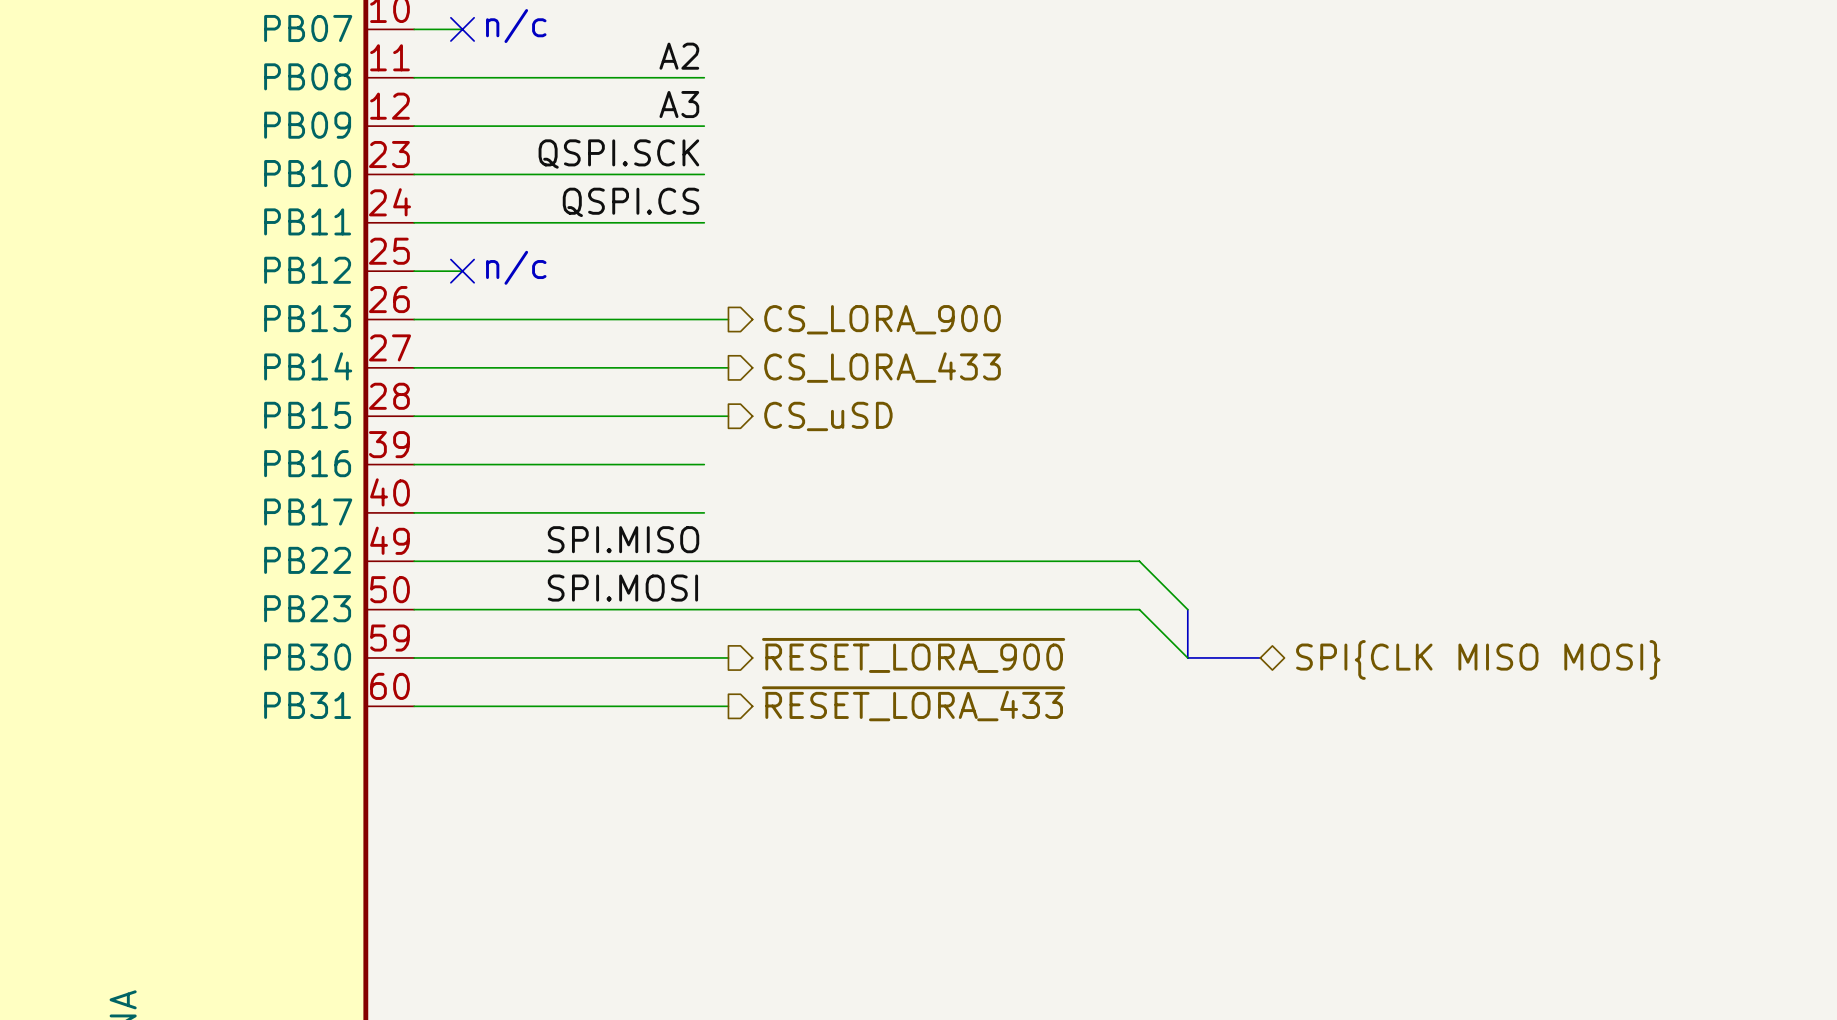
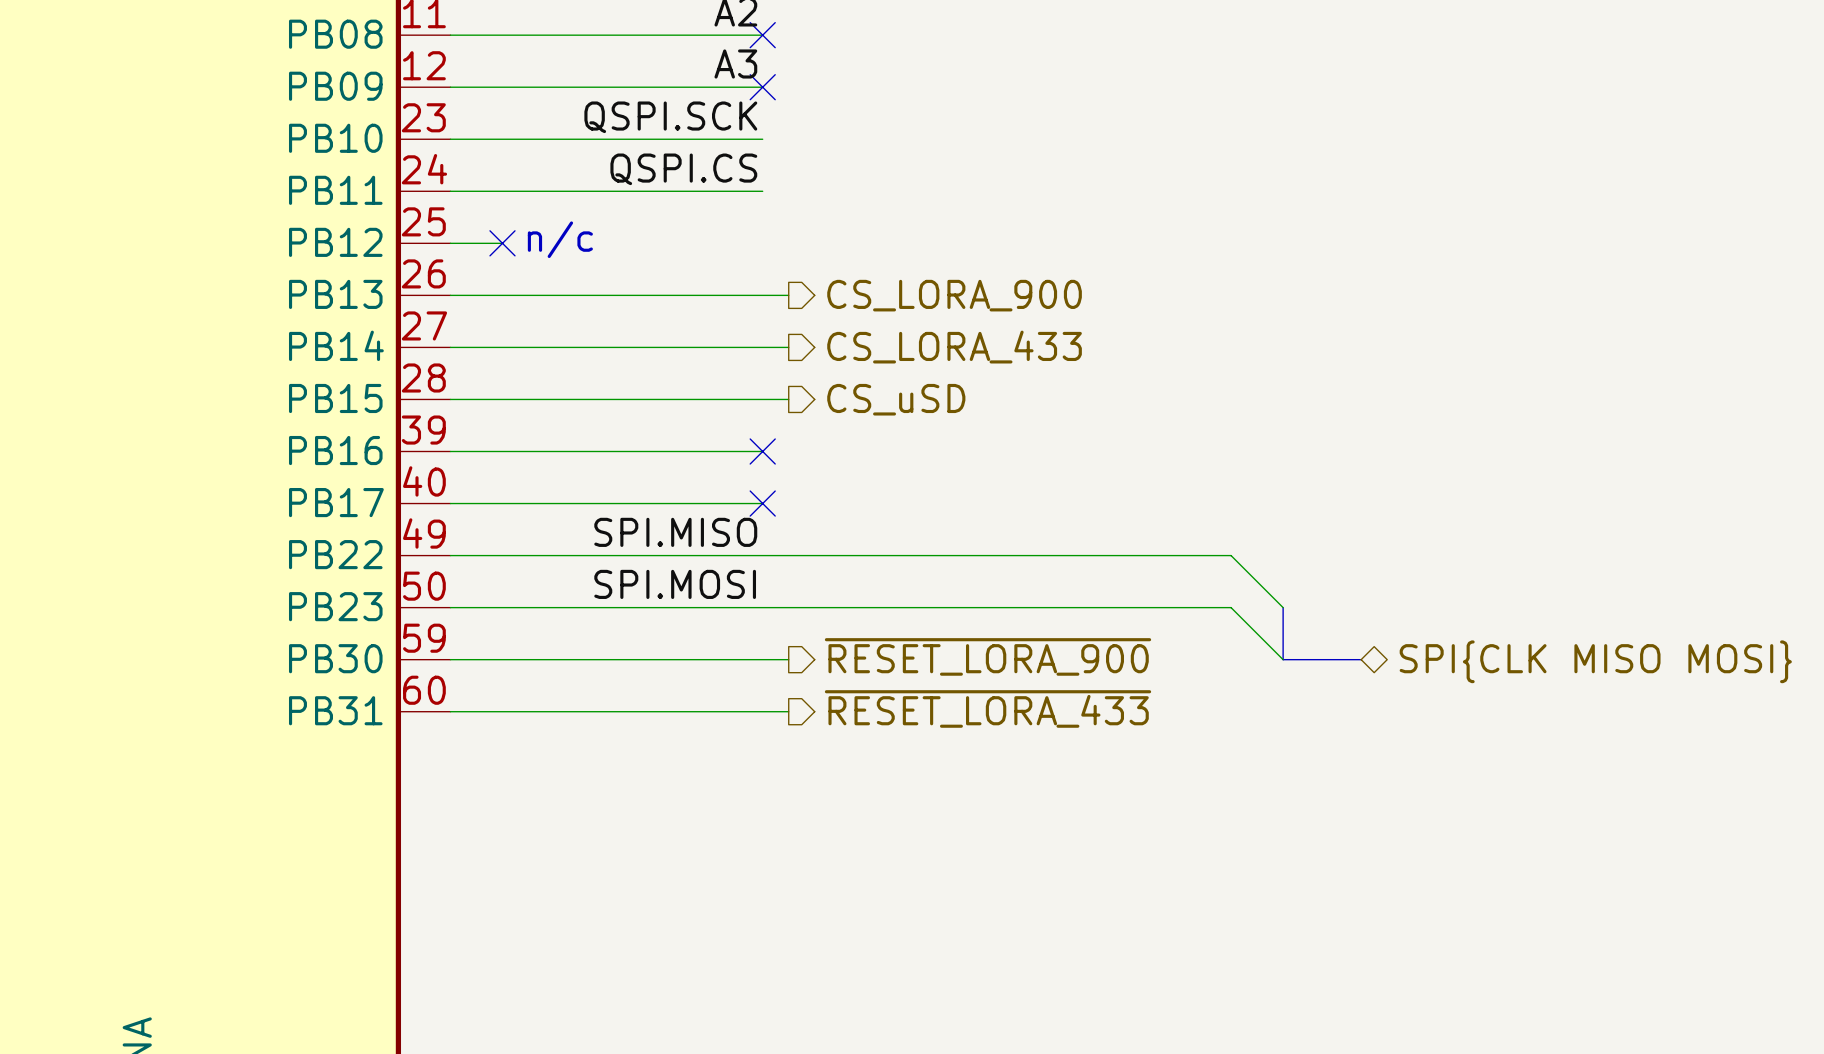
no-connect mark: none -> (762, 35)
no-connect mark: none -> (762, 87)
no-connect mark: none -> (762, 451)
no-connect mark: none -> (762, 503)

